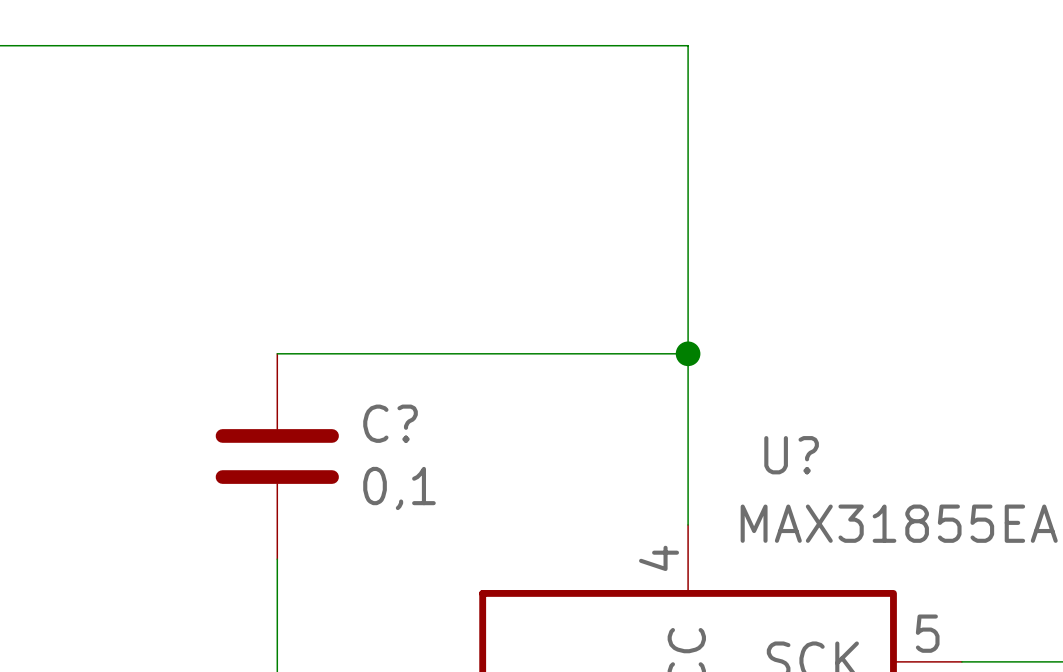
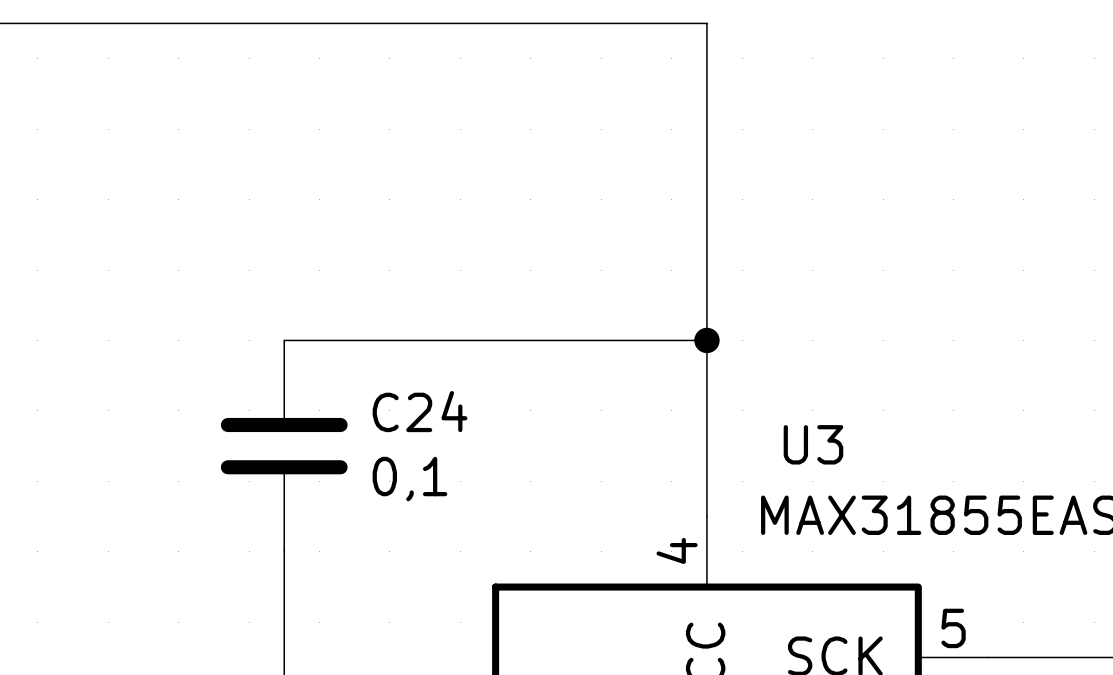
C? name: C? (390, 423) -> C24 (420, 411)
U? name: U? (791, 455) -> U3 (813, 444)

